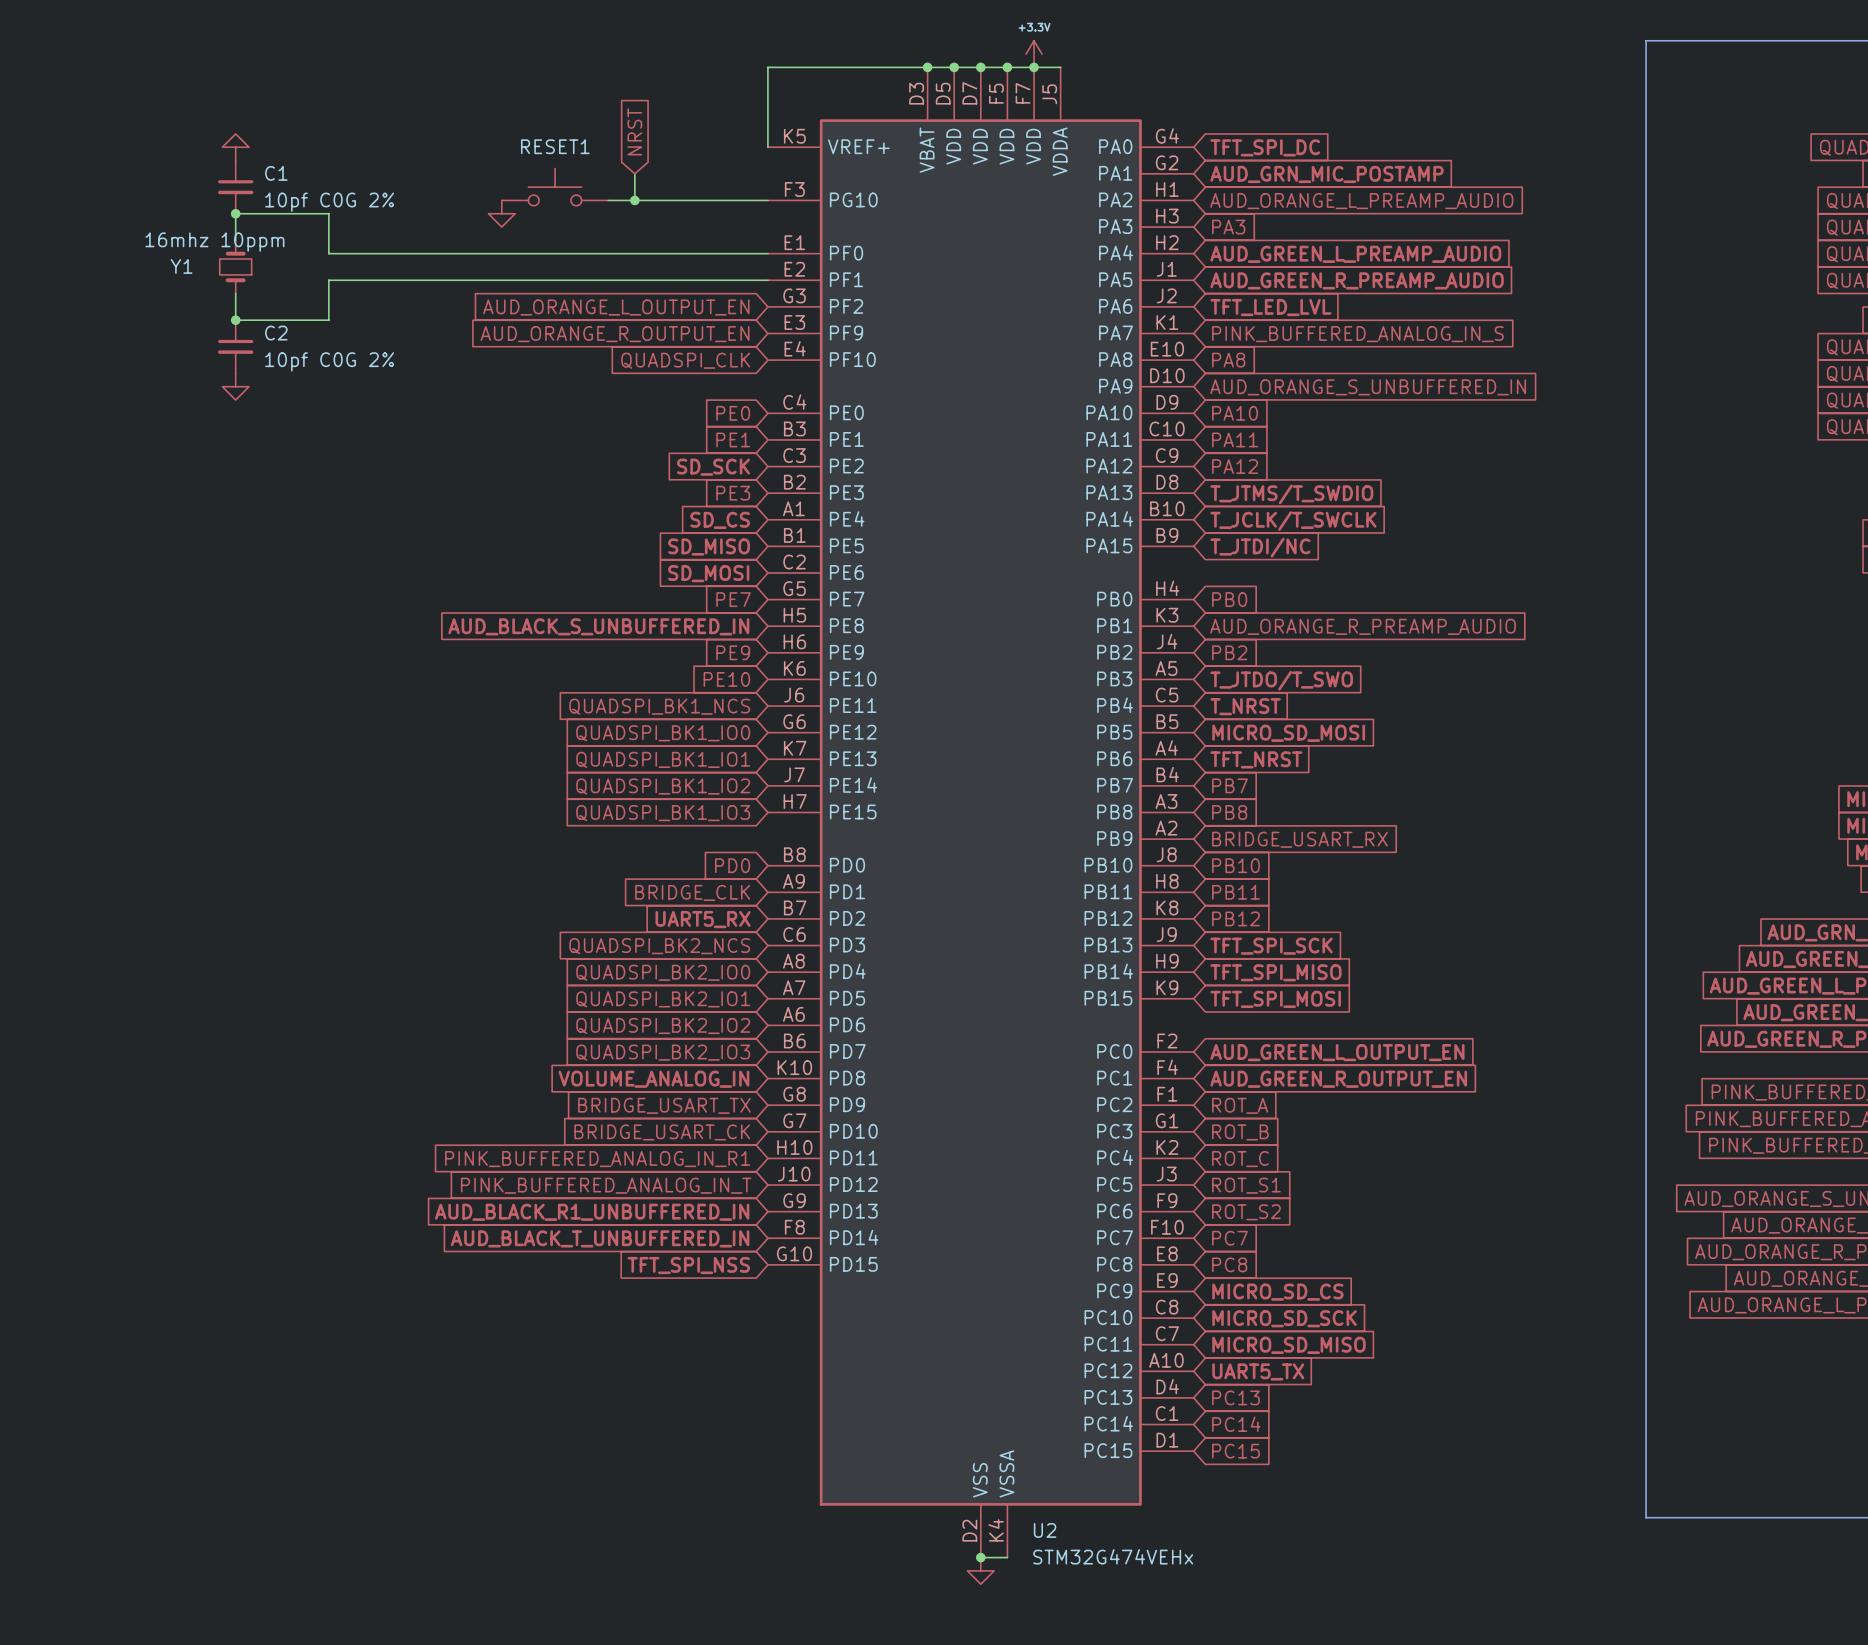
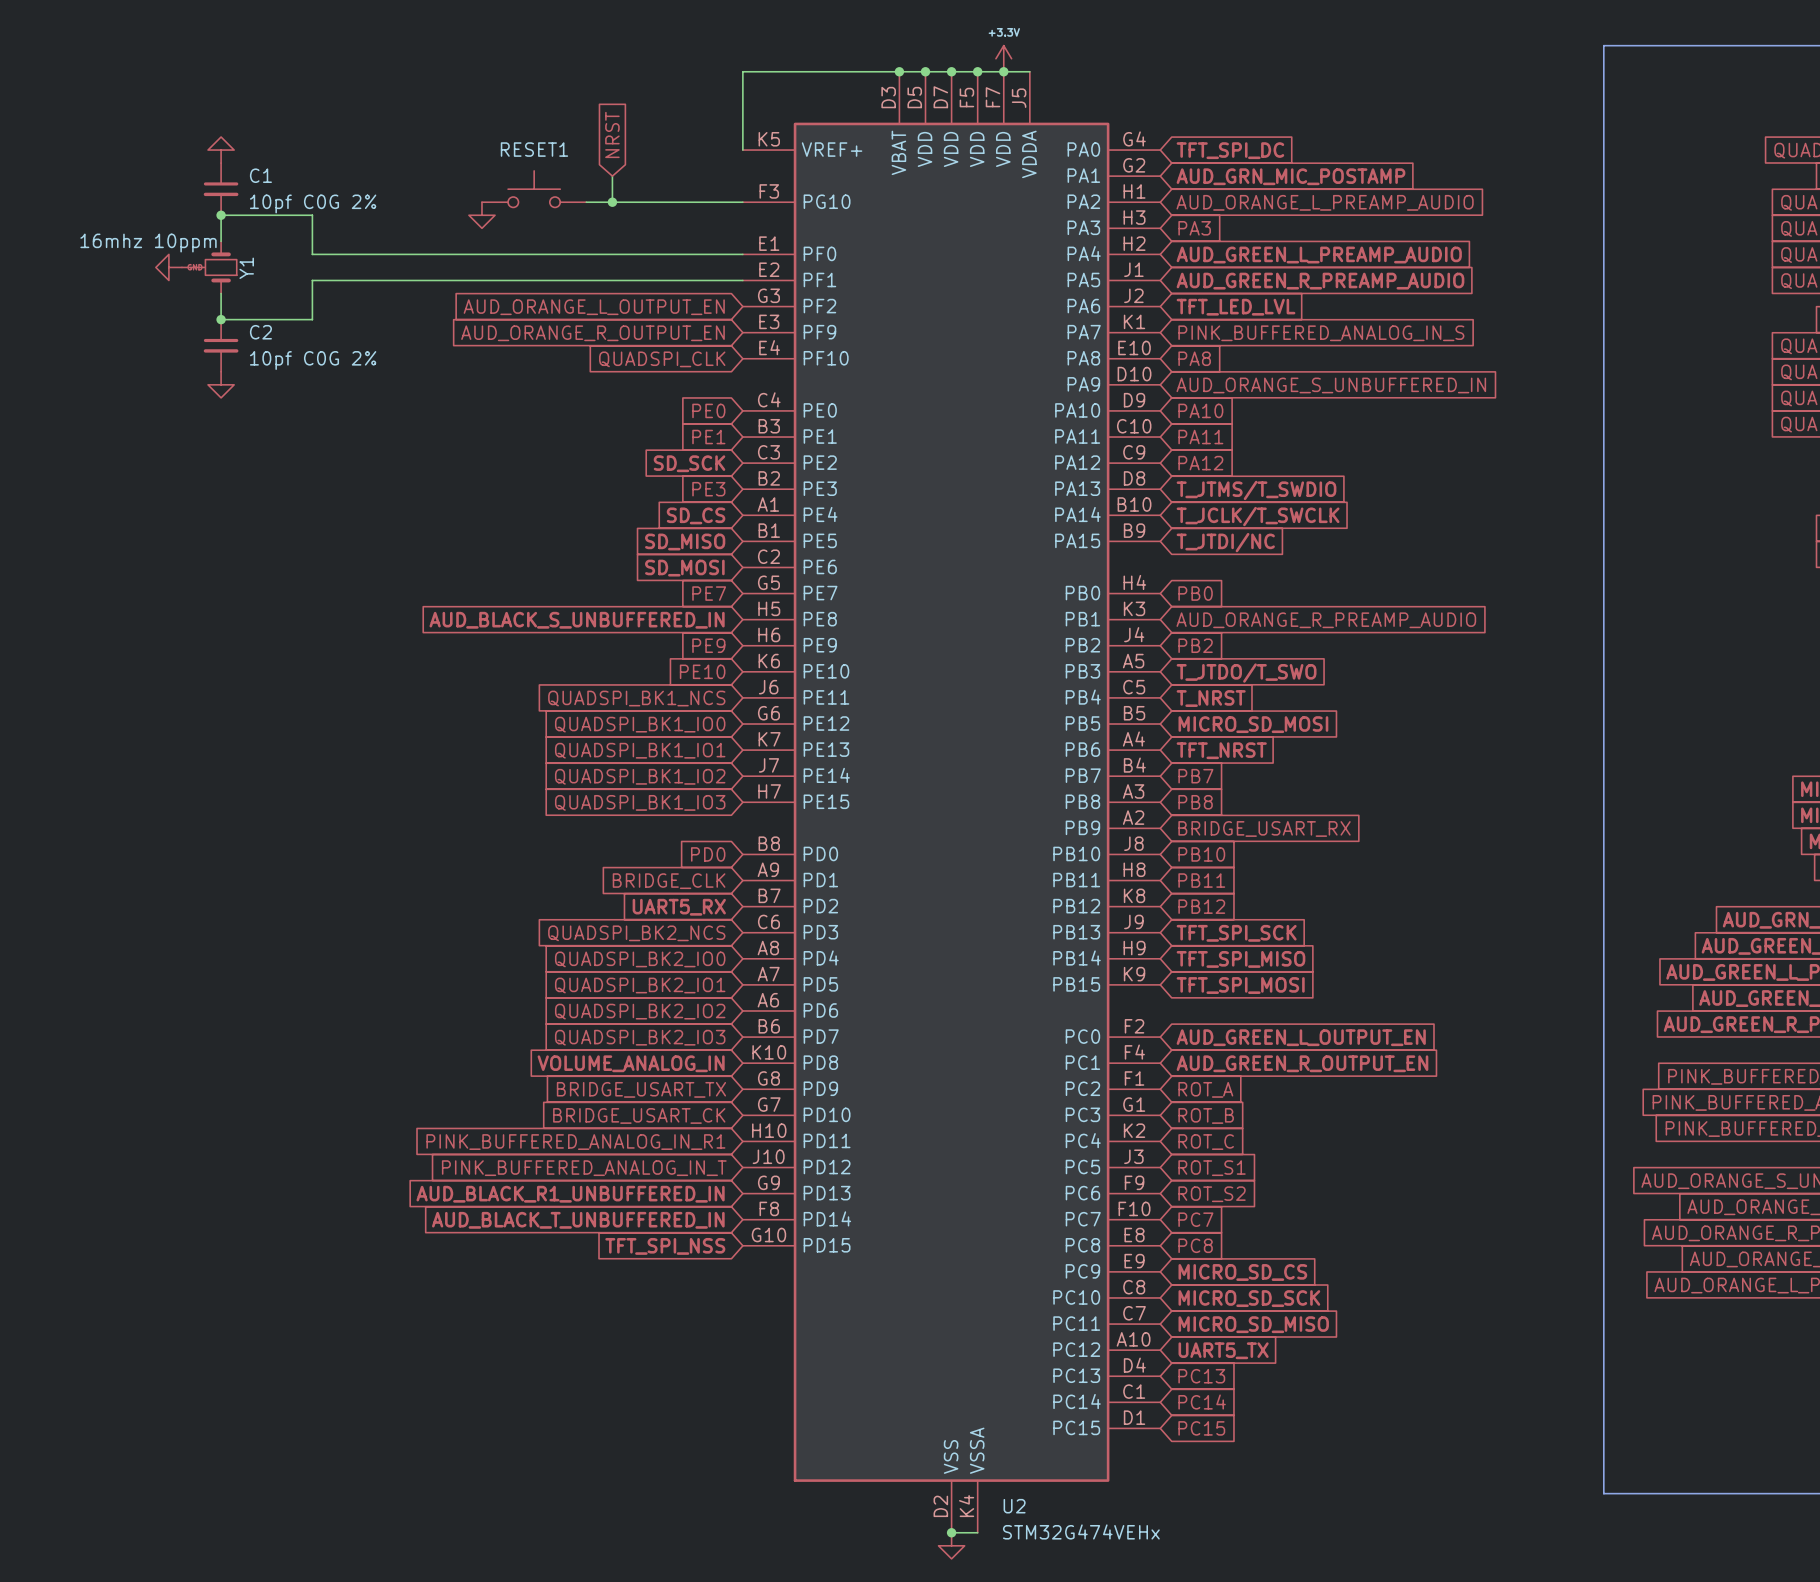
Y1 symbol: [219, 240, 252, 294] -> [181, 241, 237, 294]
Y1 value position: 16mhz 10ppm (214, 242) -> 16mhz 10ppm (148, 243)
Y1 name position: Y1 (181, 266) -> Y1 (246, 268)
power symbol: none -> (168, 267)

